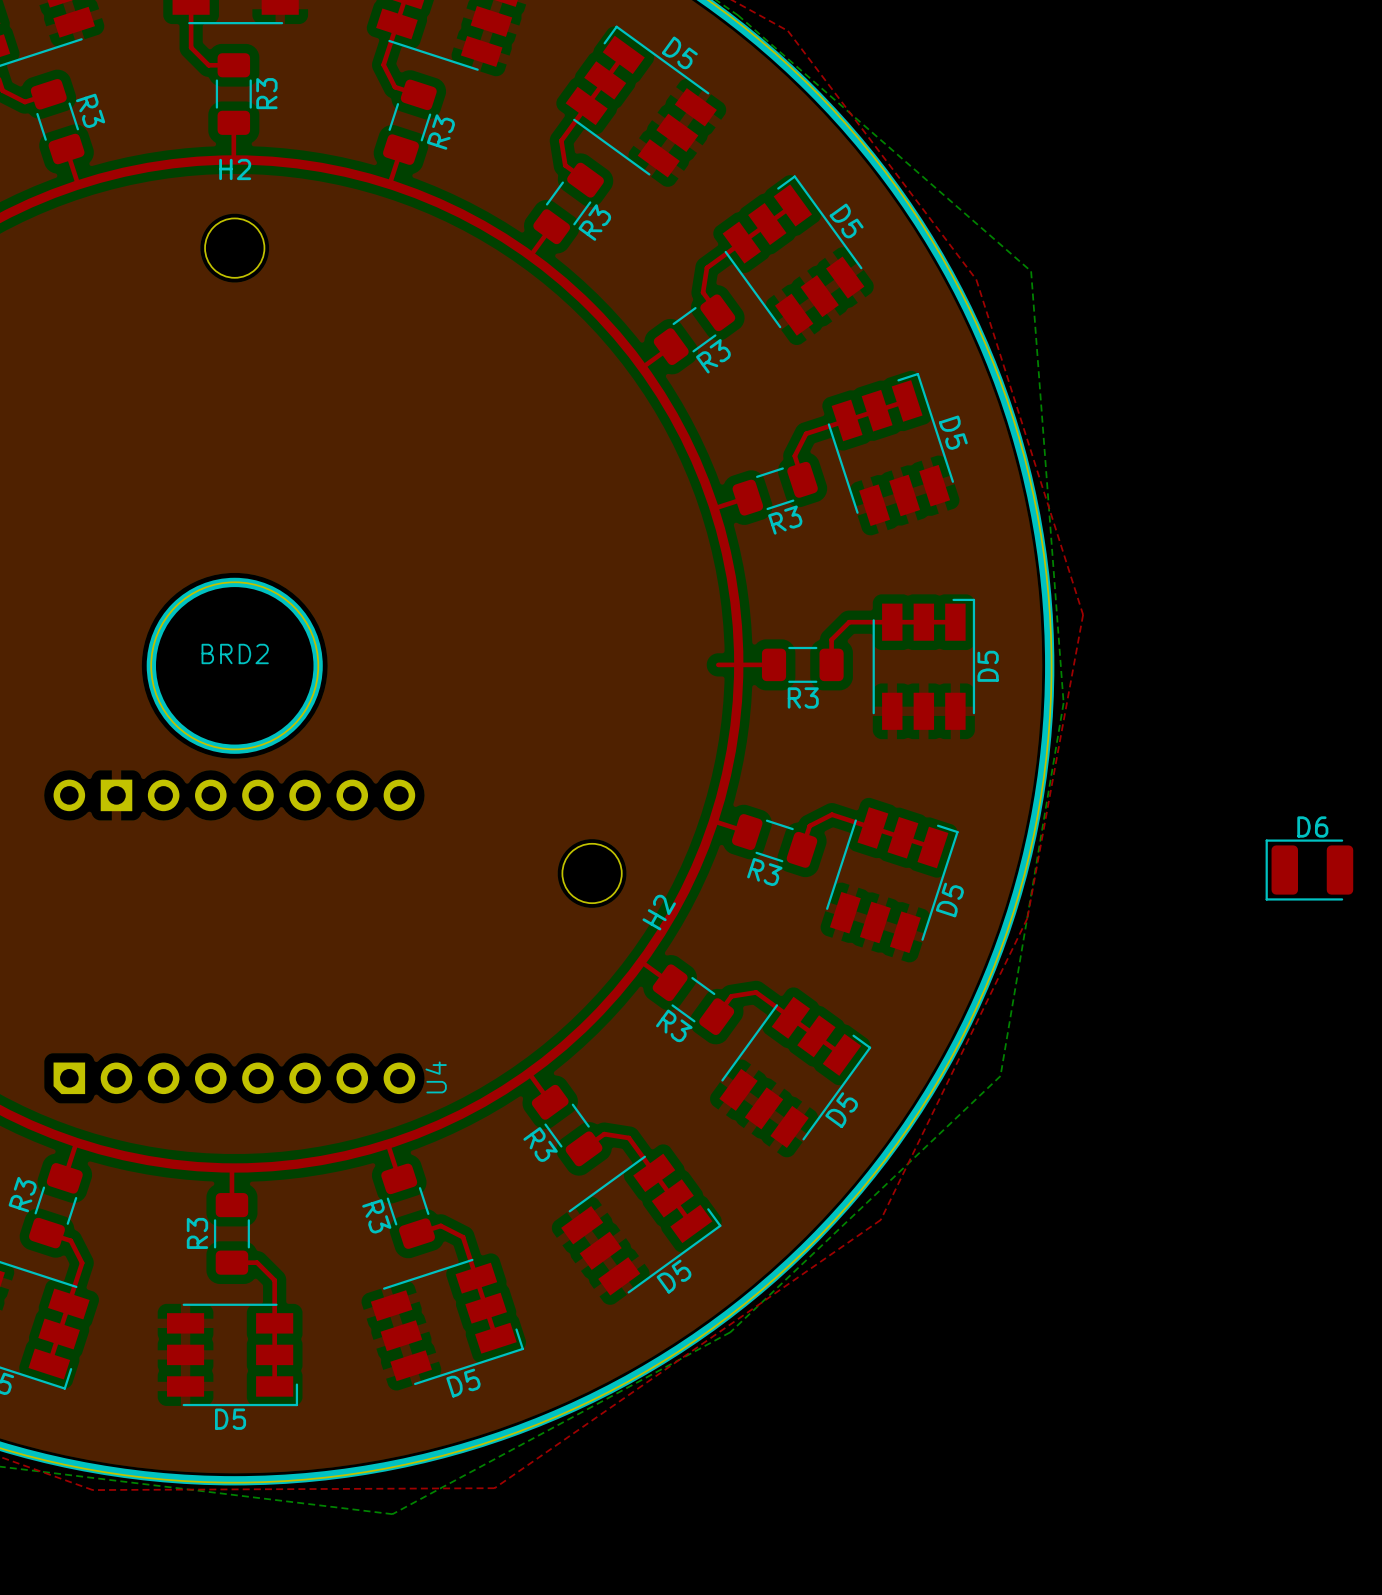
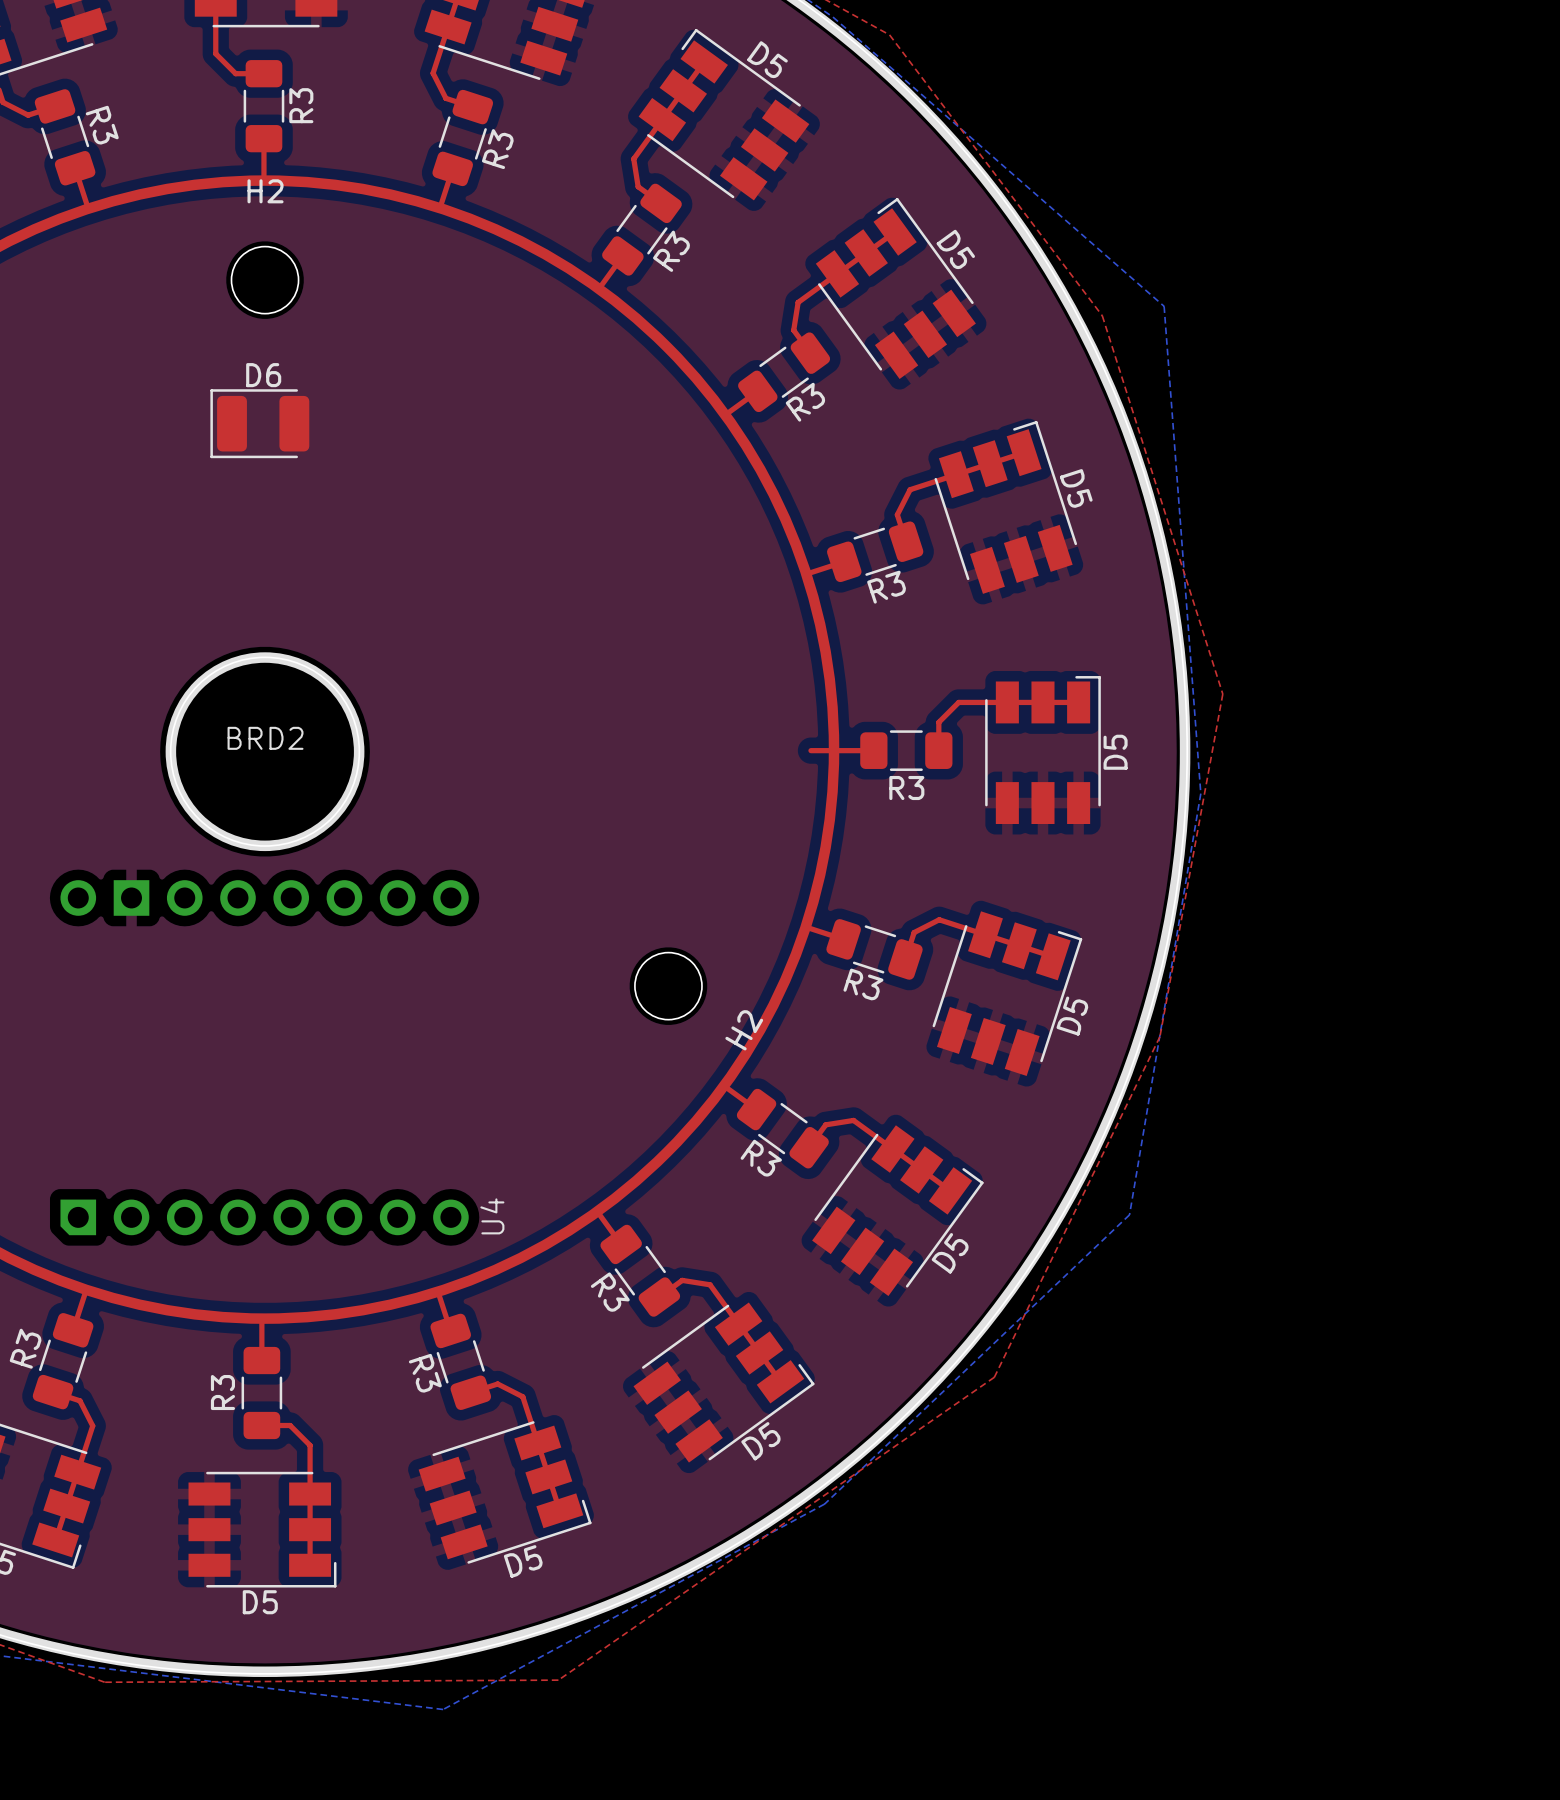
D6 position: (1309, 870) -> (259, 423)

